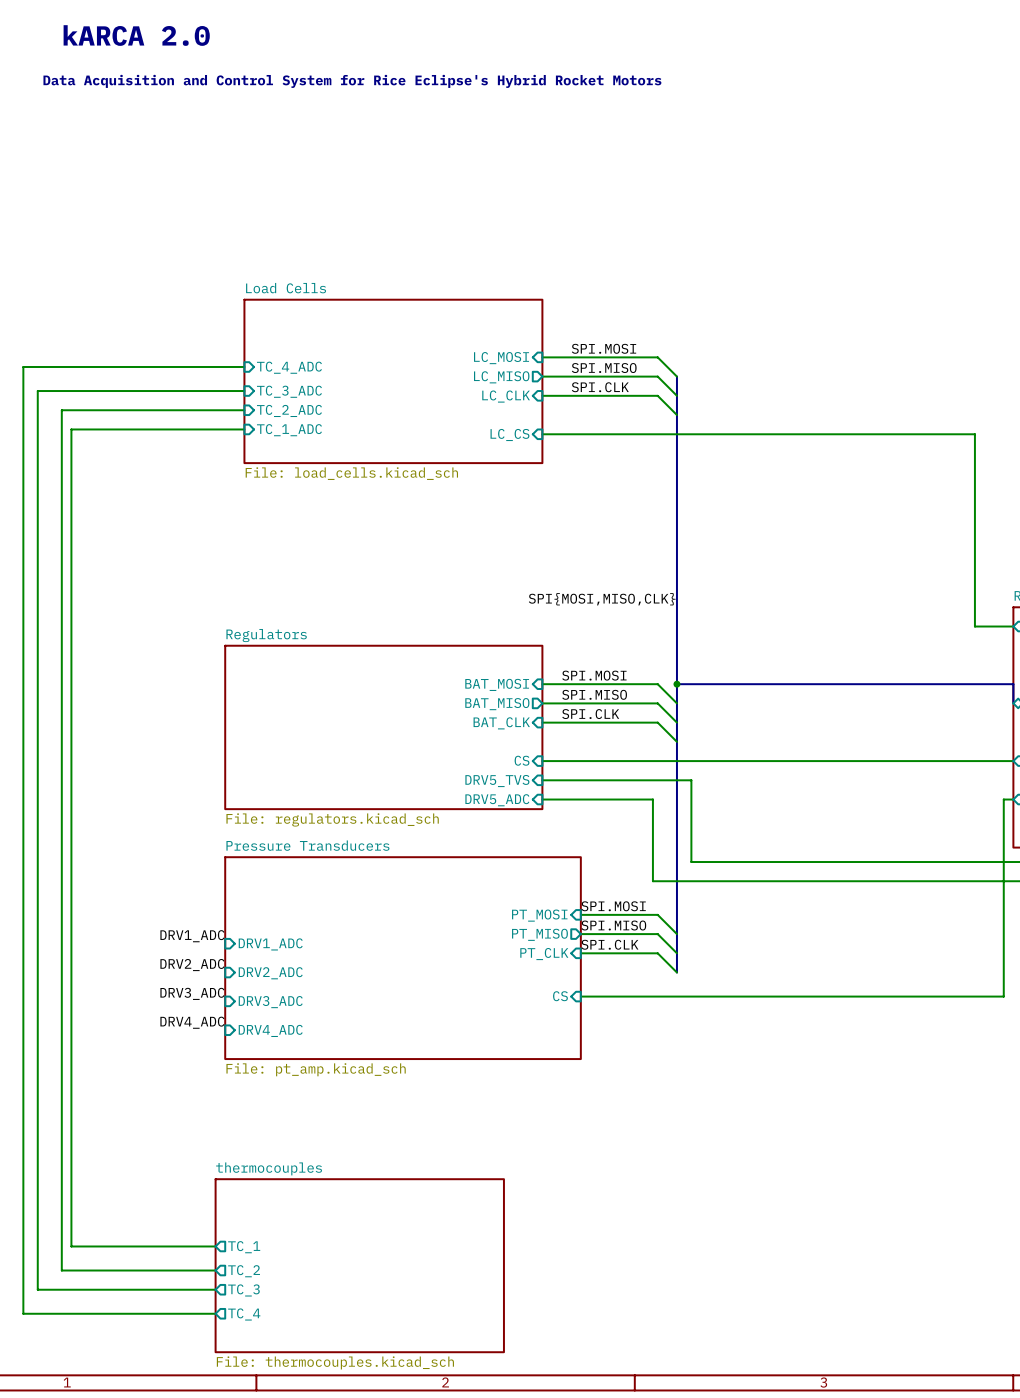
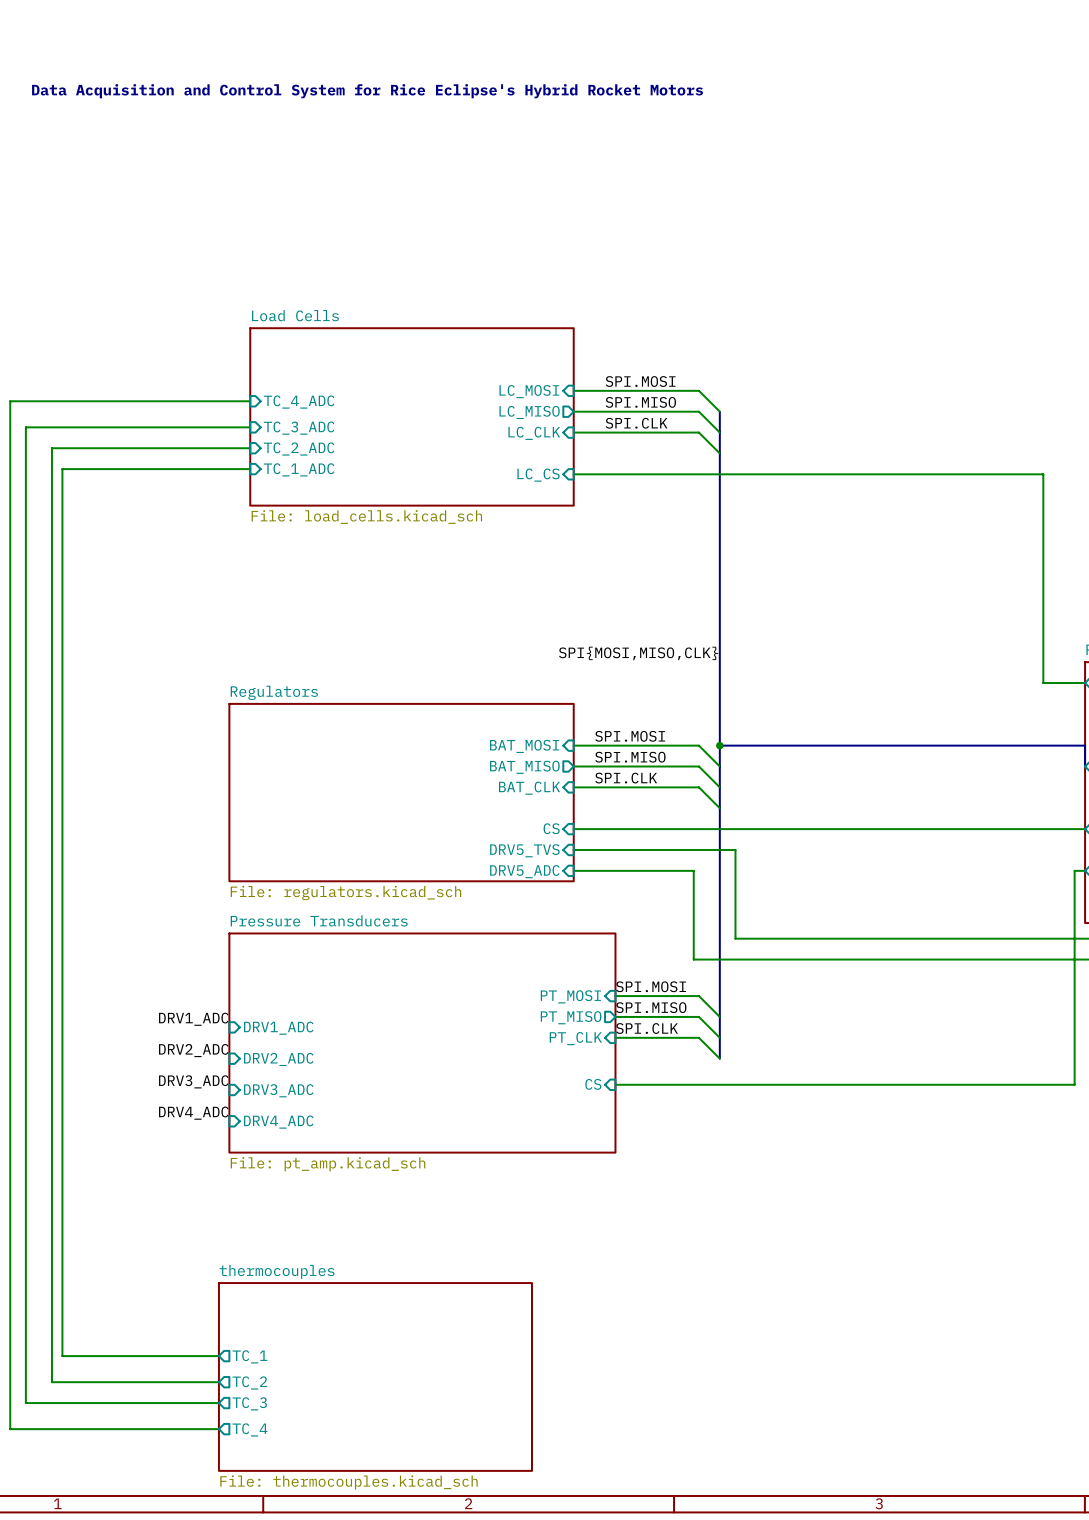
text: kARCA 2.0 (136, 35) -> none

